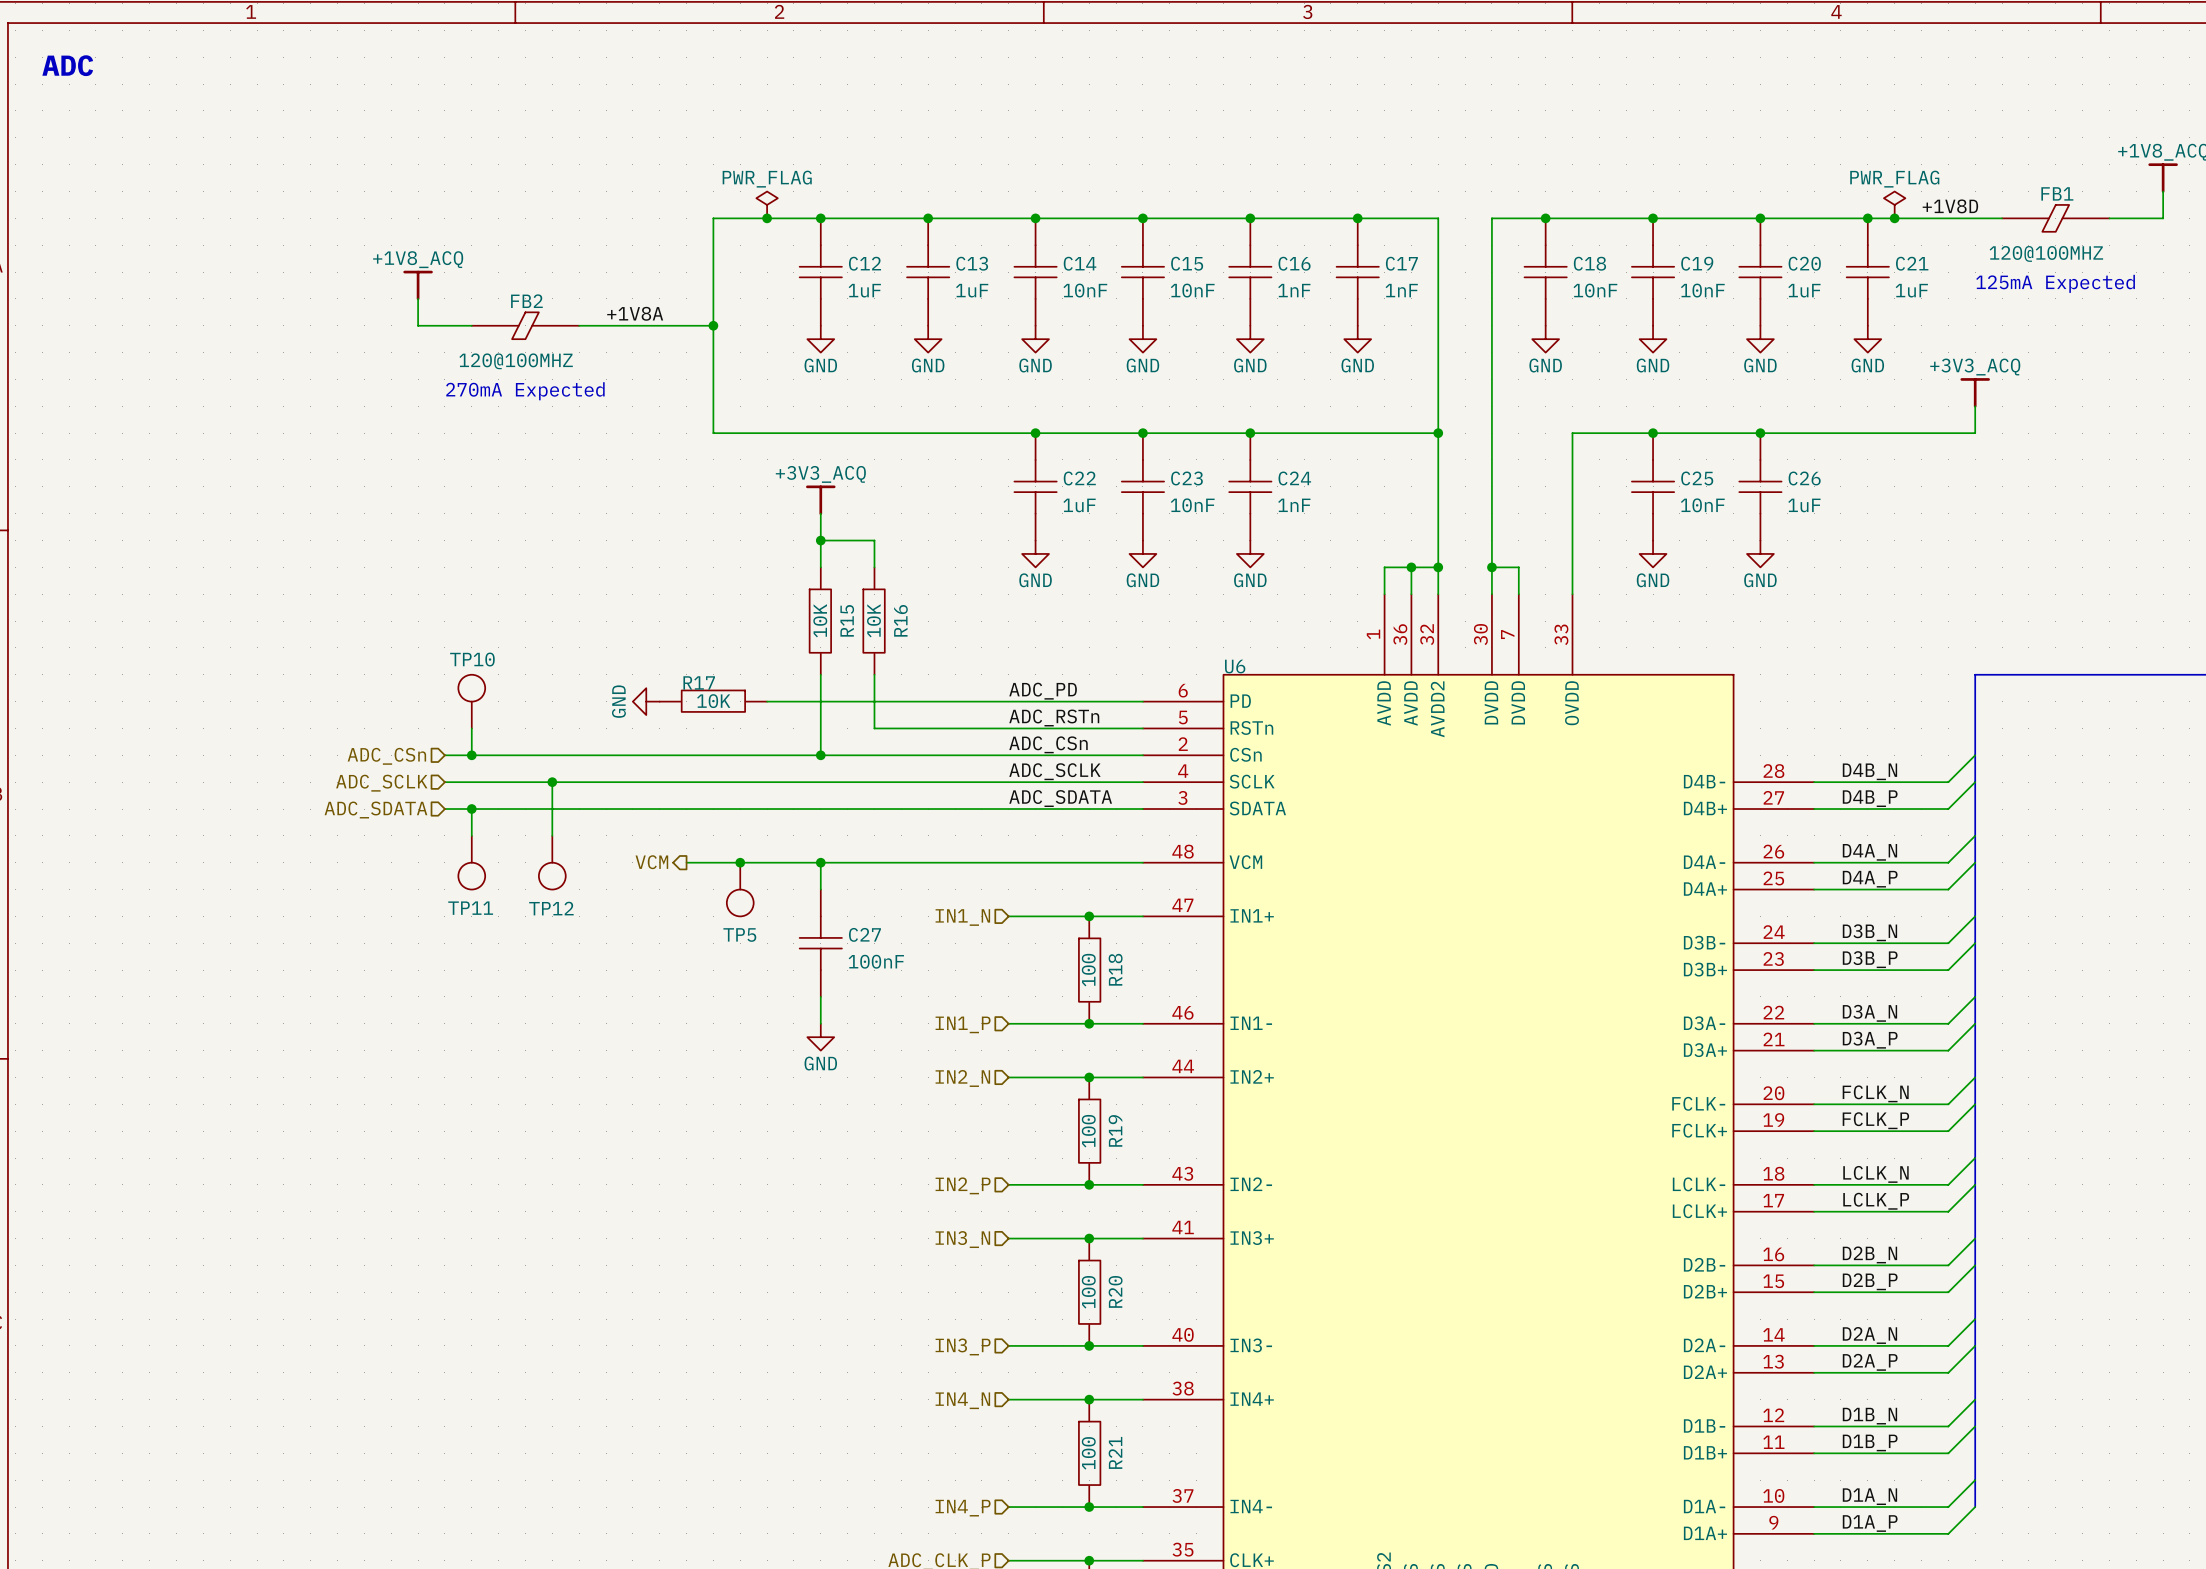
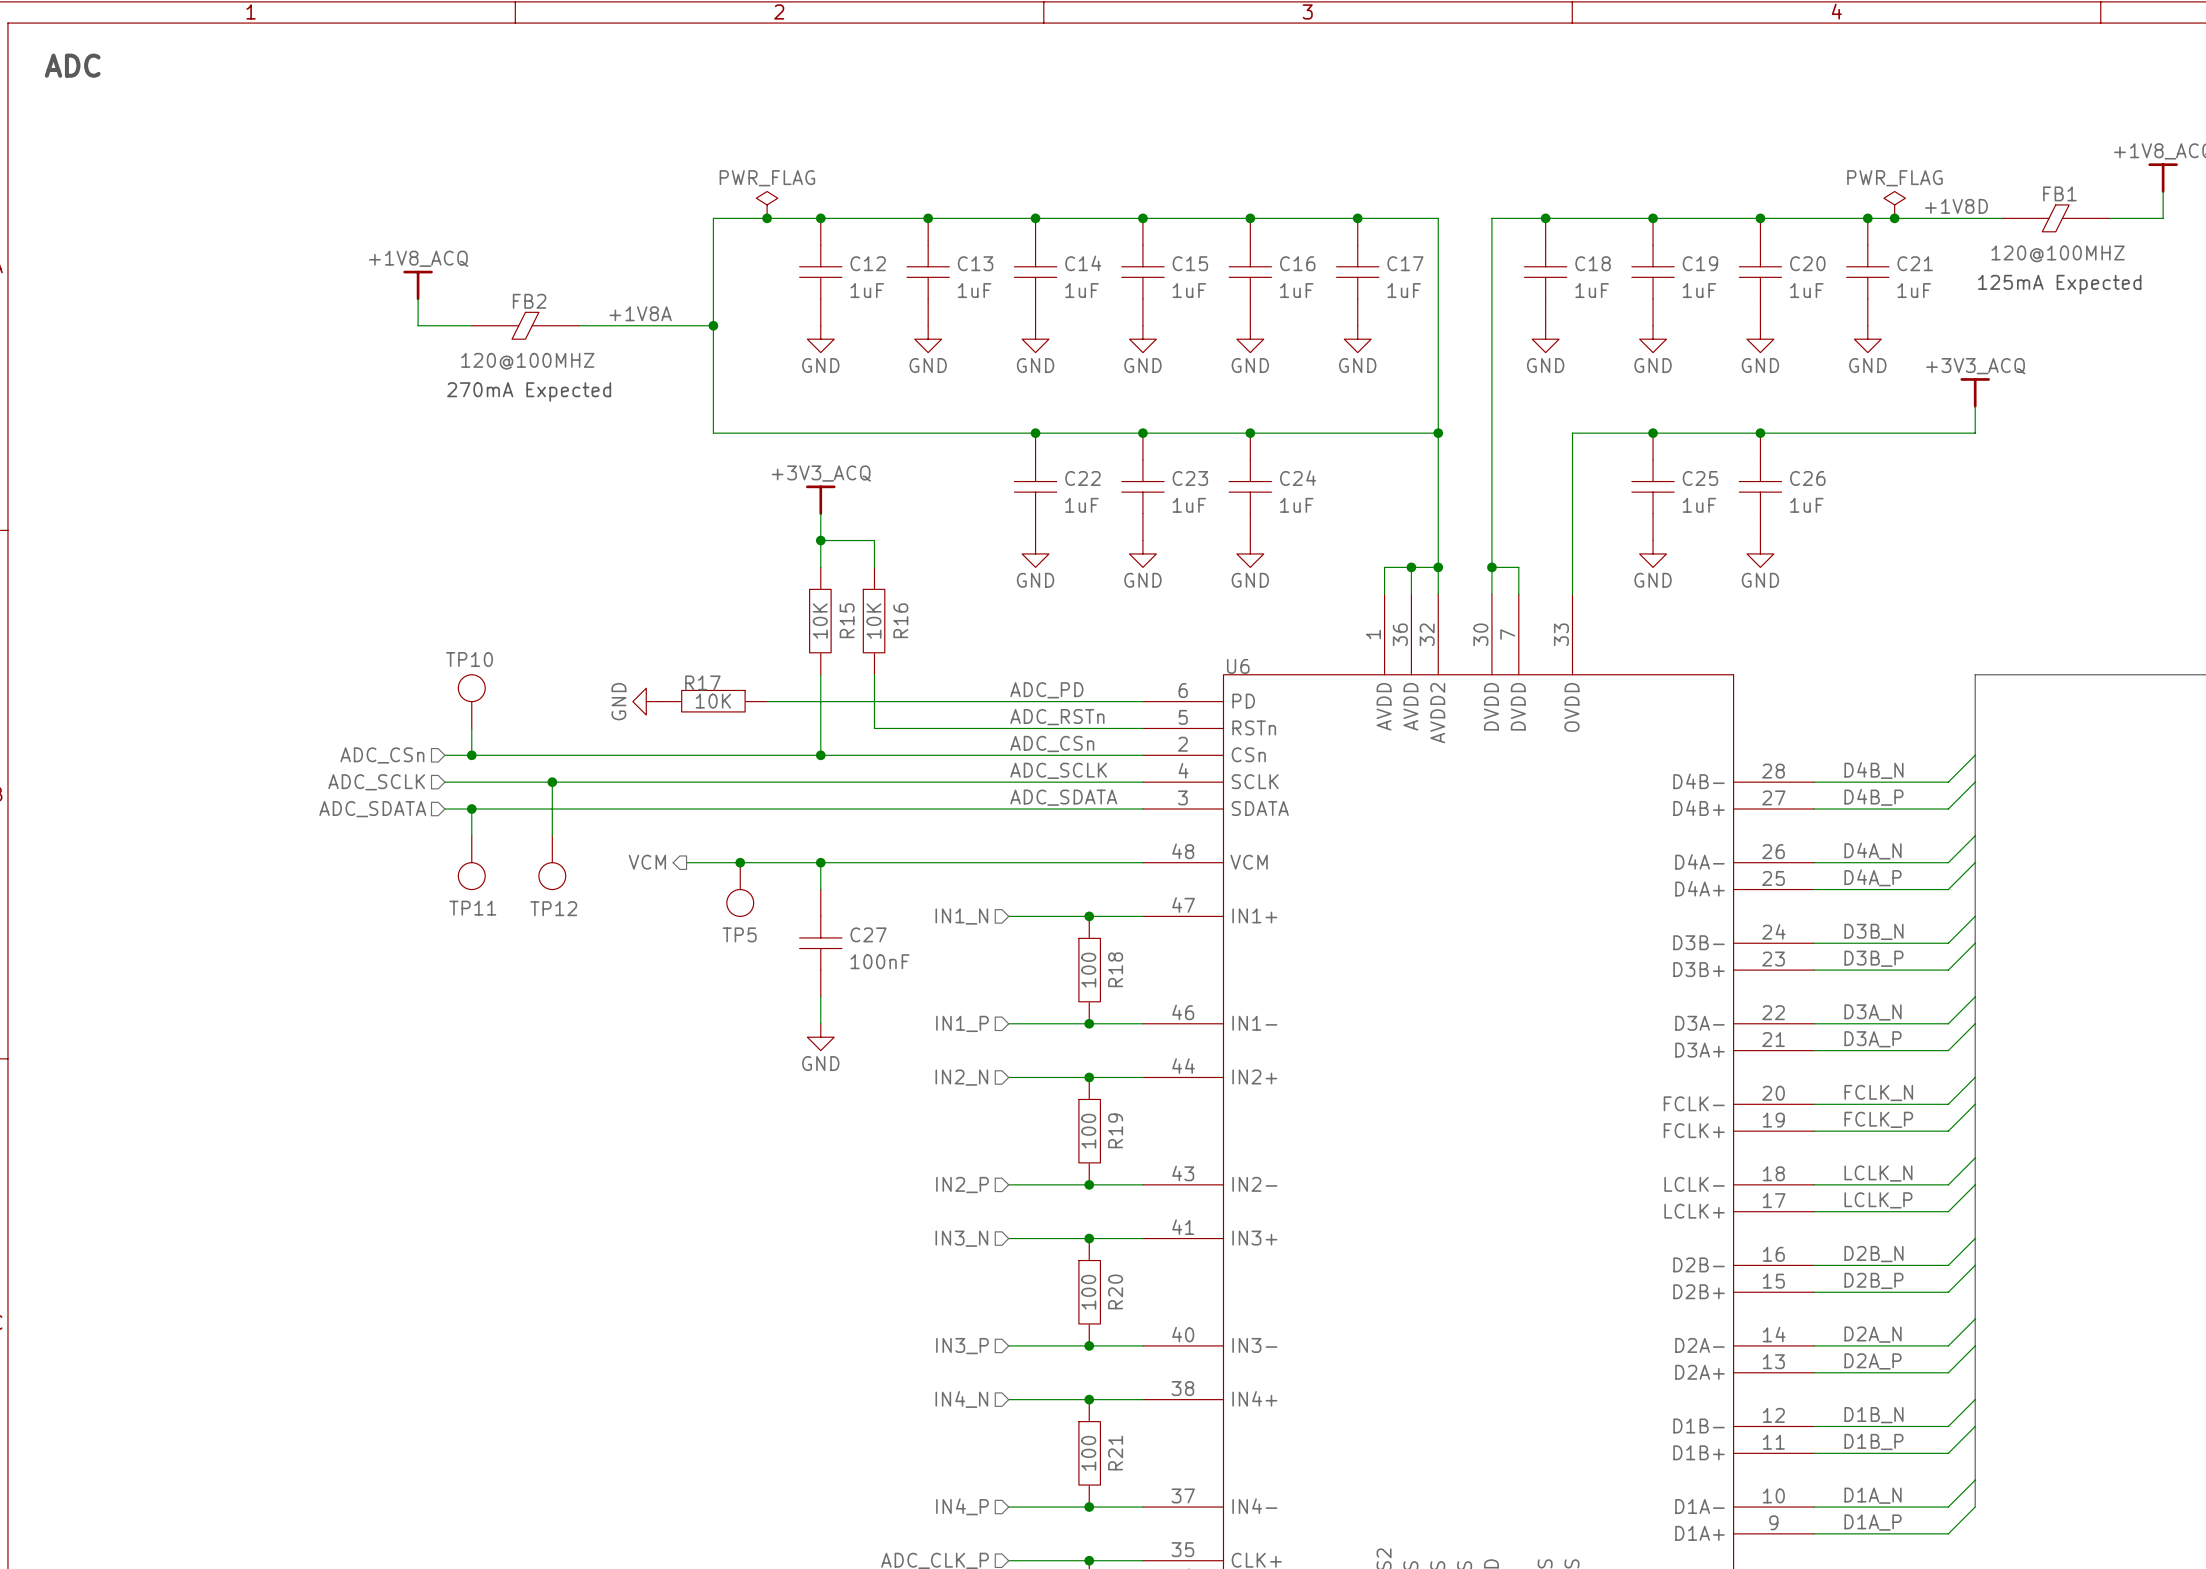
C14 value: 10nF (1085, 290) -> 1uF (1082, 290)
C15 value: 10nF (1192, 290) -> 1uF (1189, 290)
C16 value: 1nF (1294, 290) -> 1uF (1296, 290)
C17 value: 1nF (1401, 290) -> 1uF (1404, 290)
C18 value: 10nF (1595, 290) -> 1uF (1592, 290)
C19 value: 10nF (1702, 290) -> 1uF (1699, 290)
C23 value: 10nF (1192, 505) -> 1uF (1189, 505)
C24 value: 1nF (1294, 505) -> 1uF (1296, 505)
C25 value: 10nF (1702, 505) -> 1uF (1699, 505)

